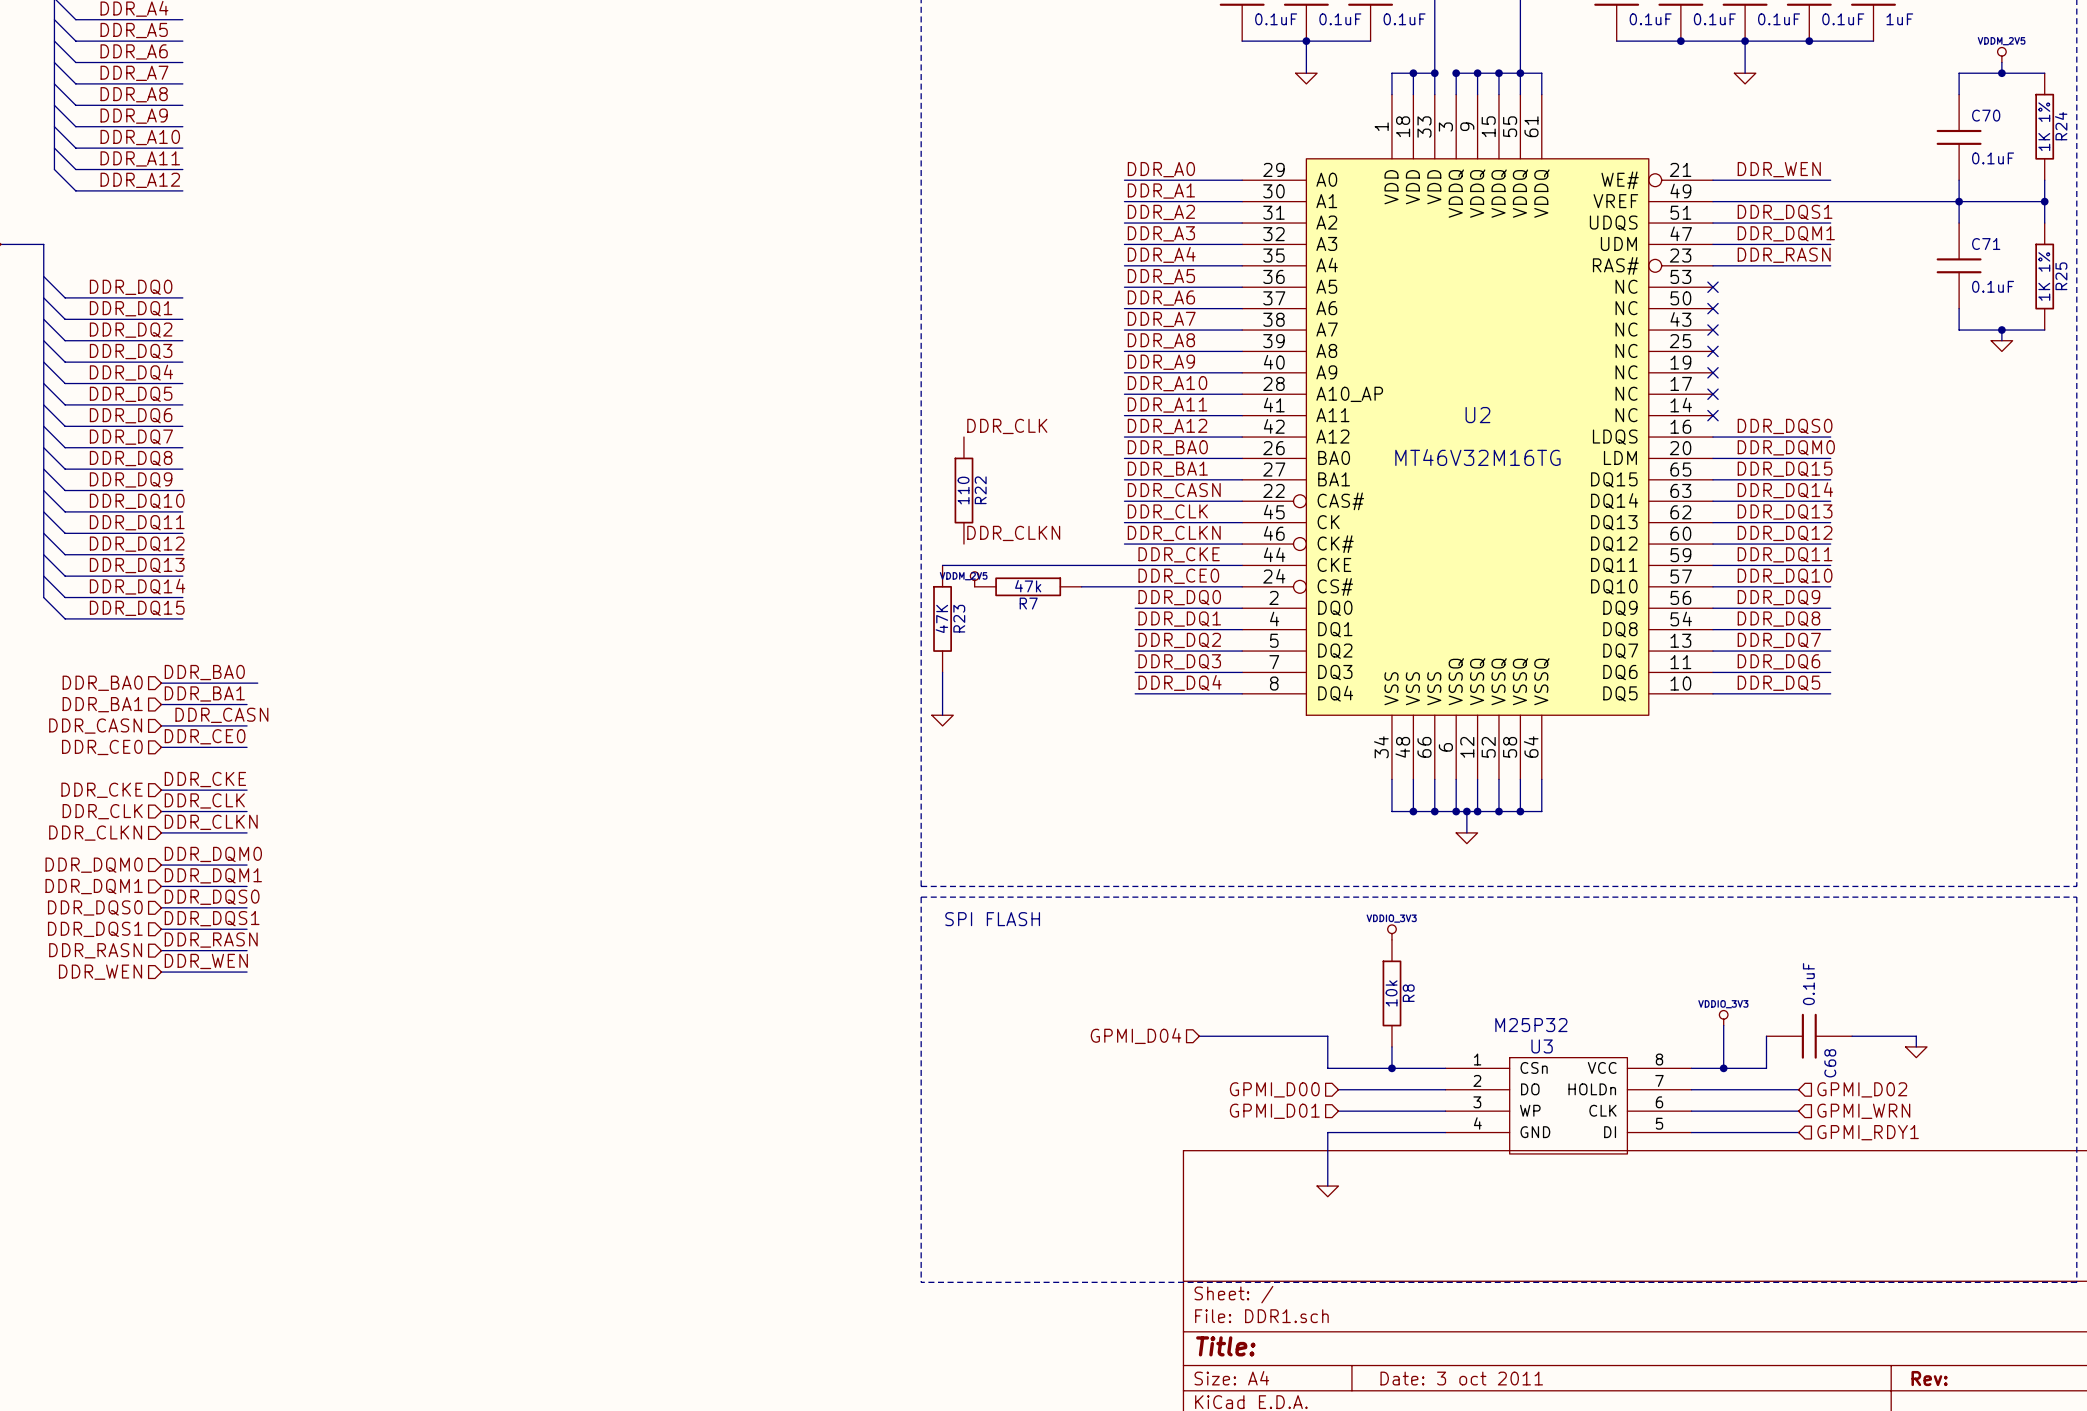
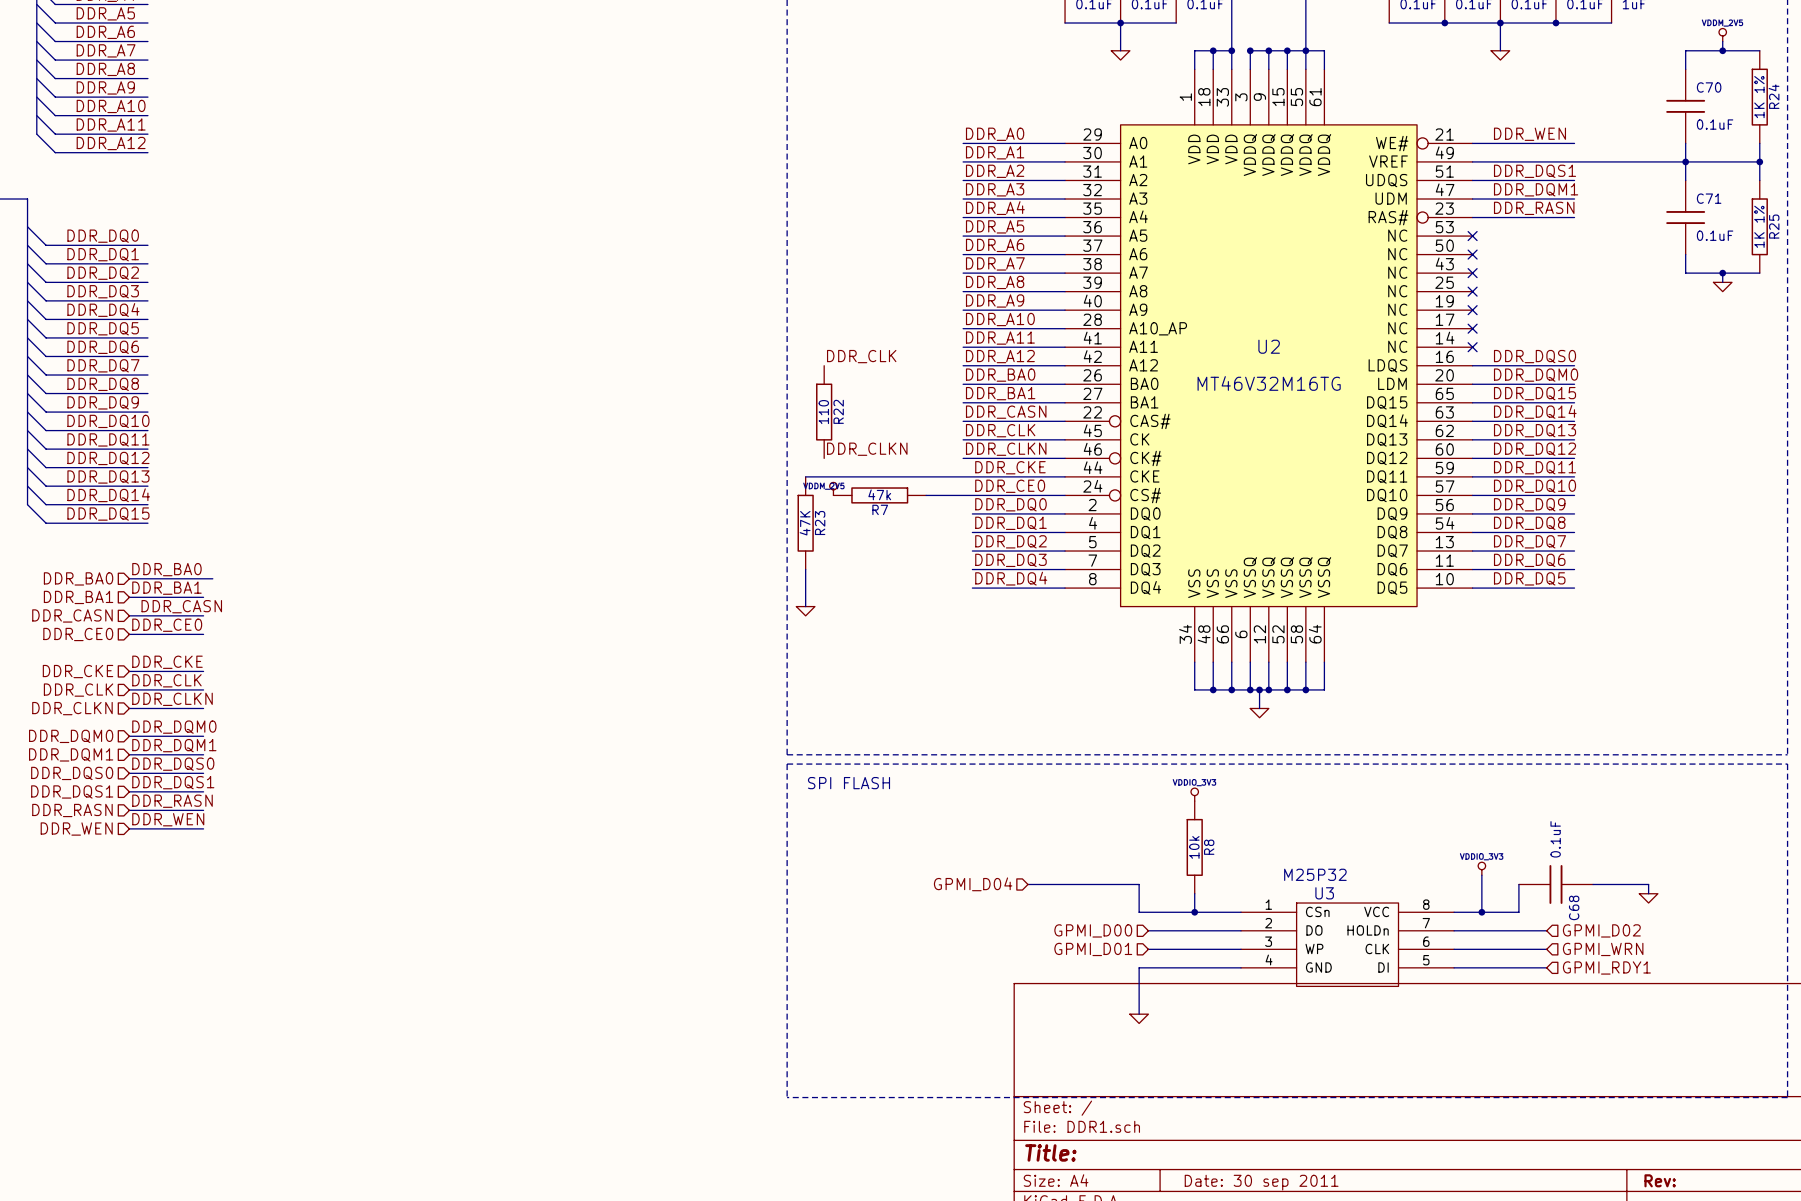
title block: Date: 3 oct 2011 (1461, 1378) -> Date: 30 sep 2011 (1261, 1182)

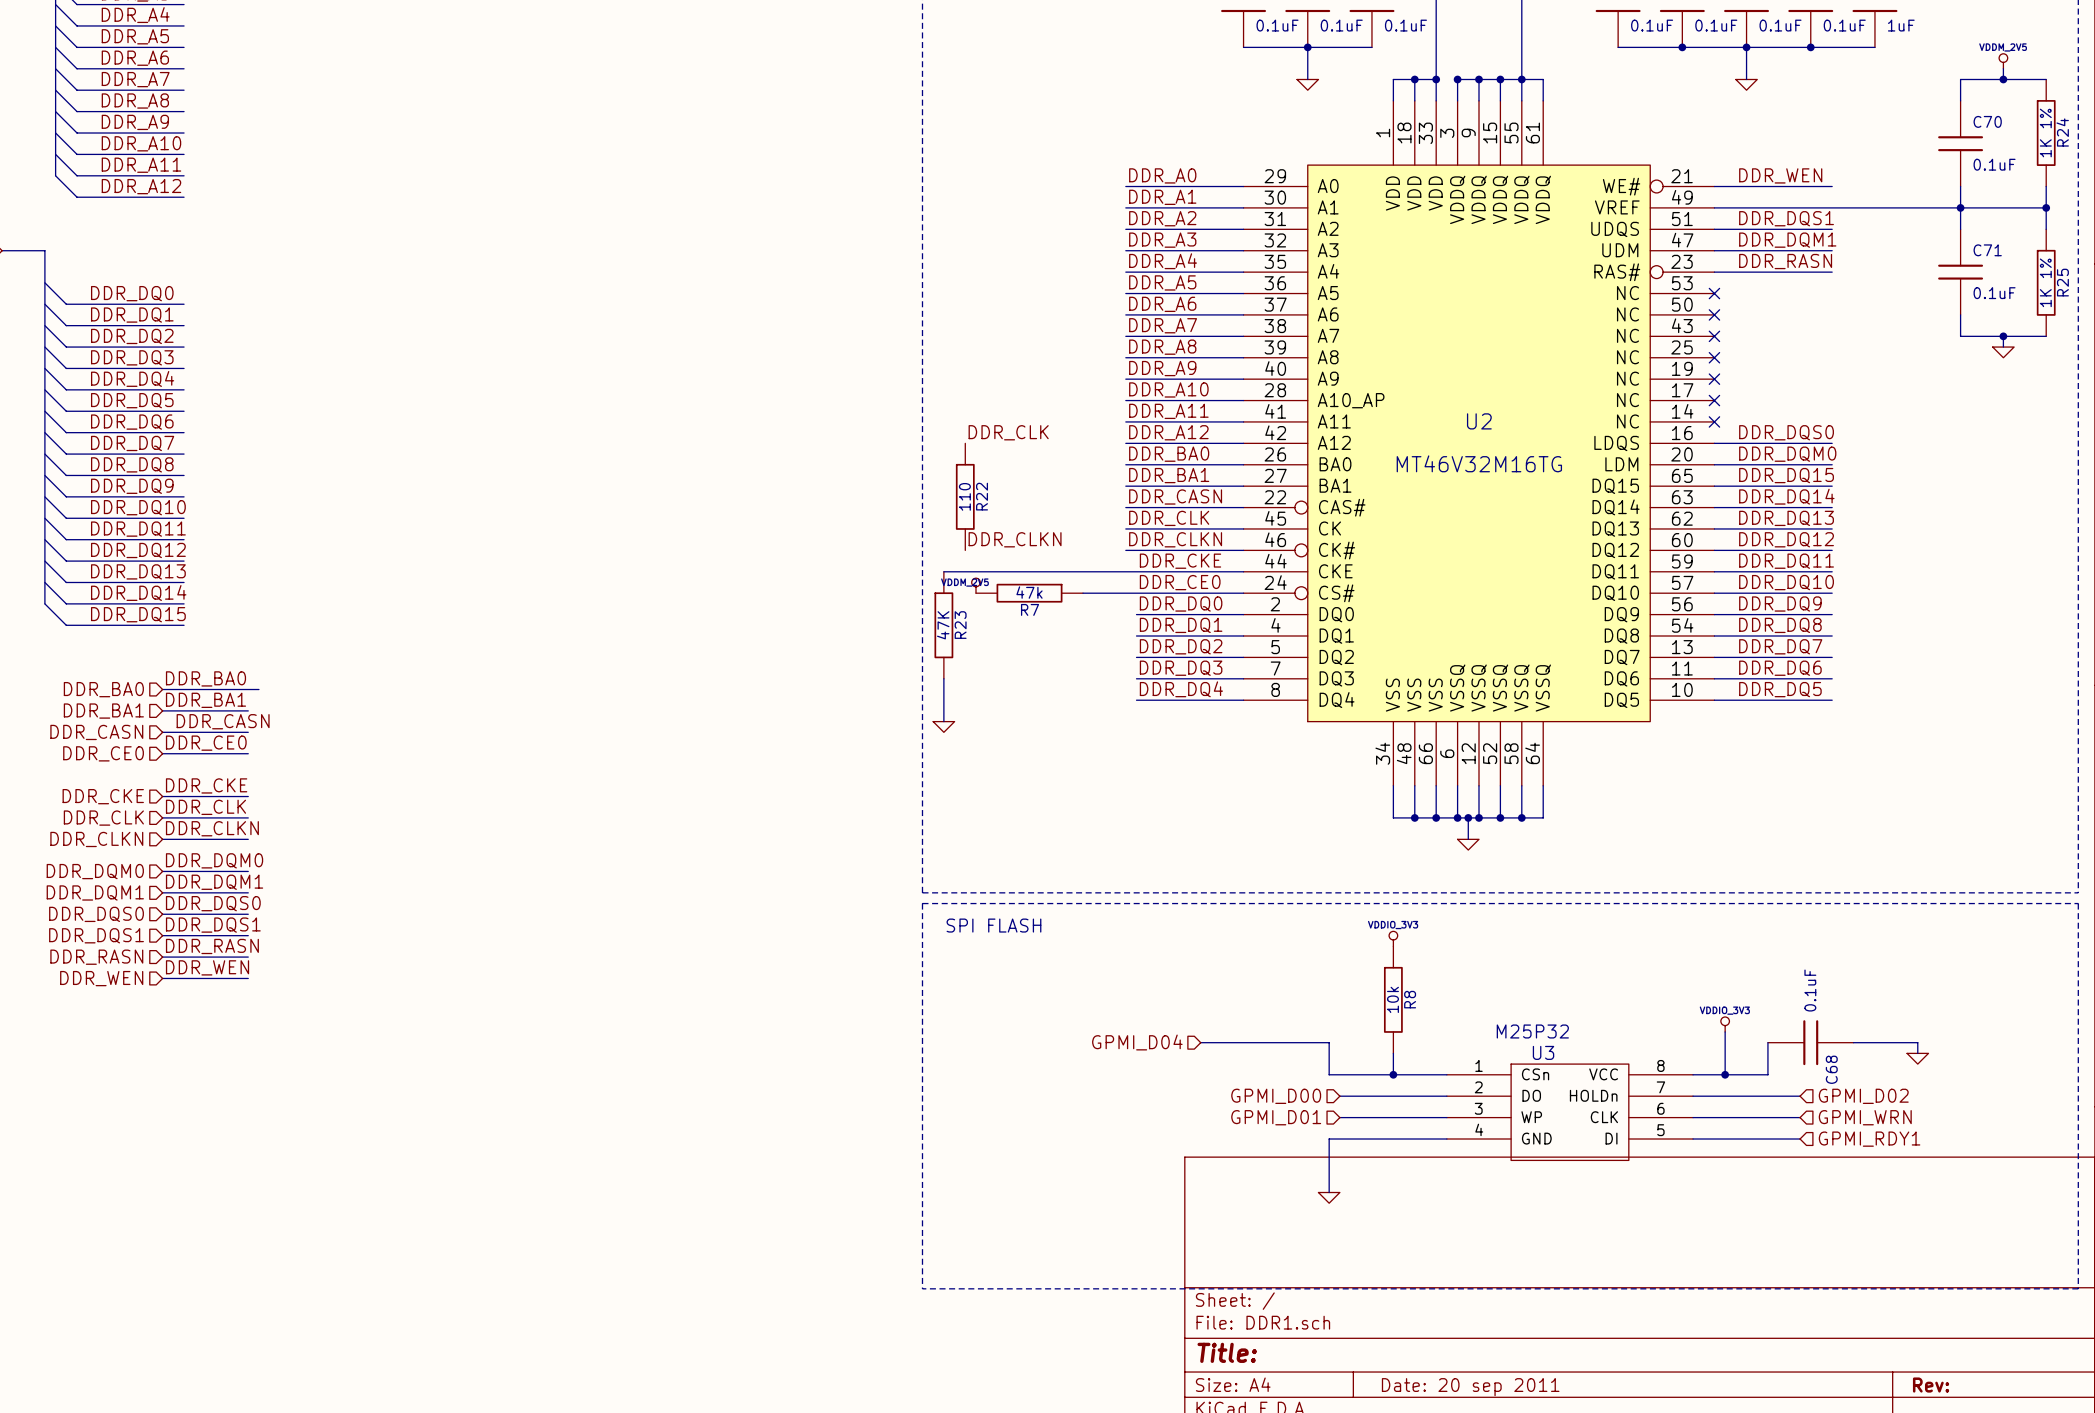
title block: Date: 30 sep 2011 (1261, 1182) -> Date: 20 sep 2011 (1470, 1387)

